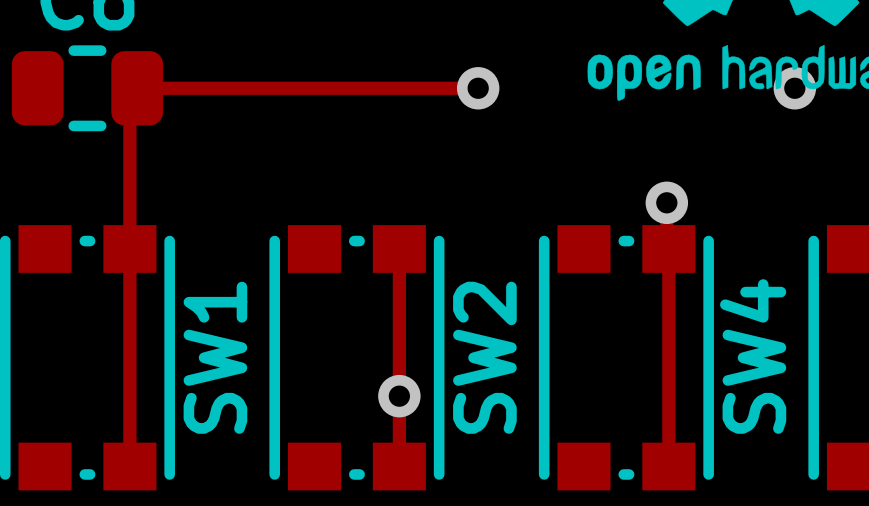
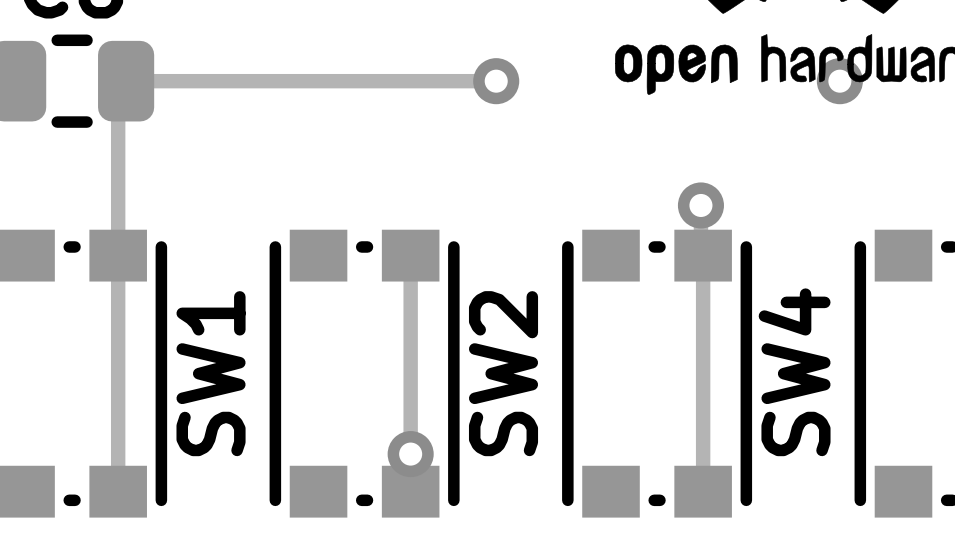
via position: (399, 396) -> (410, 454)

